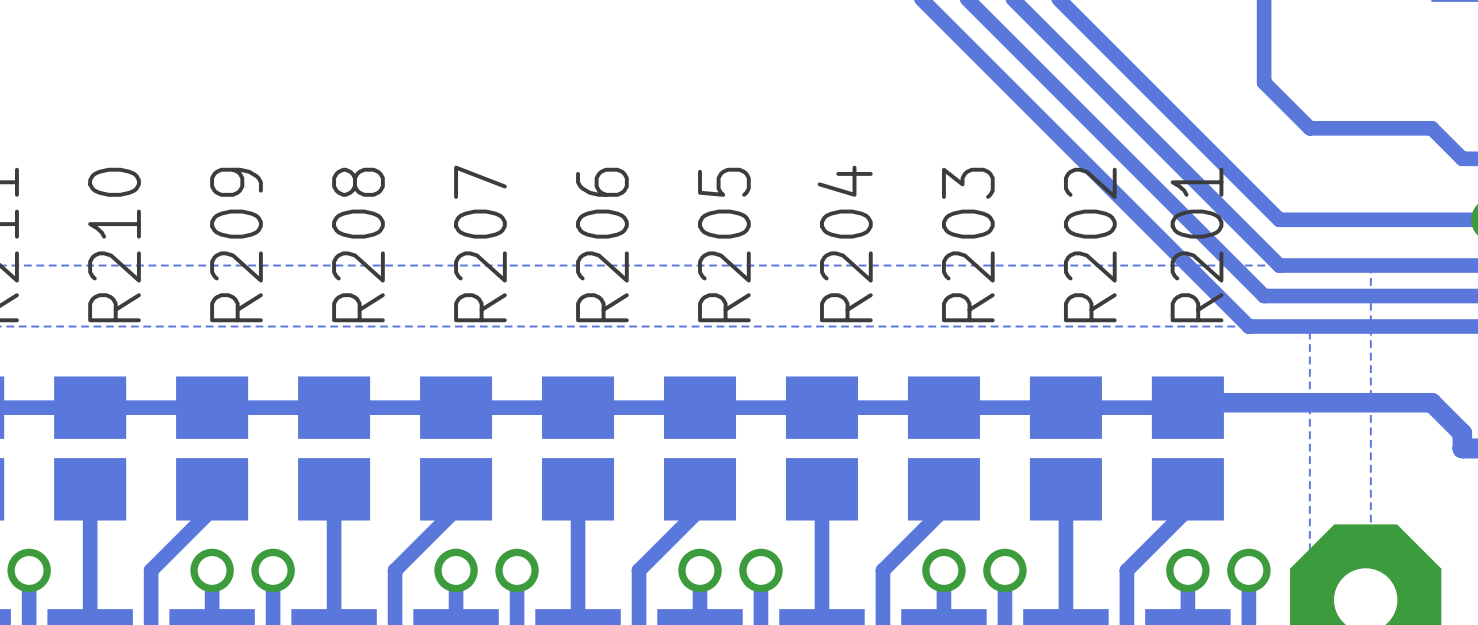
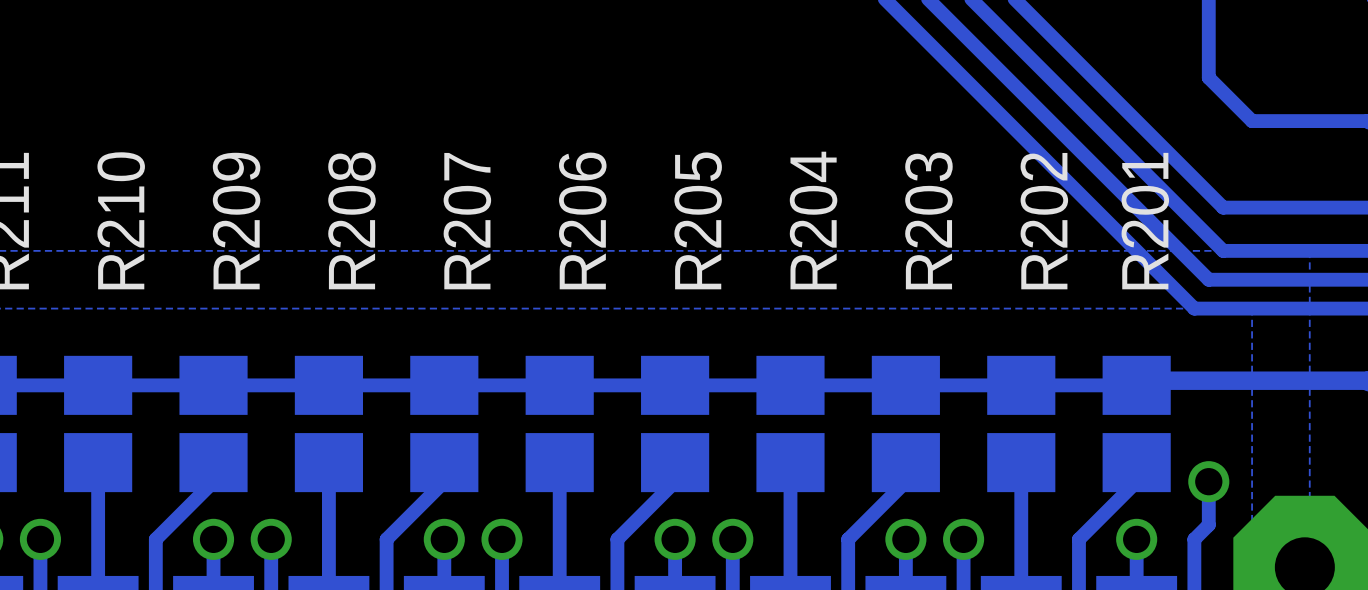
track: none -> (1208, 481) (1208, 524) (1194, 539)
via position: (1248, 570) -> (1208, 481)

